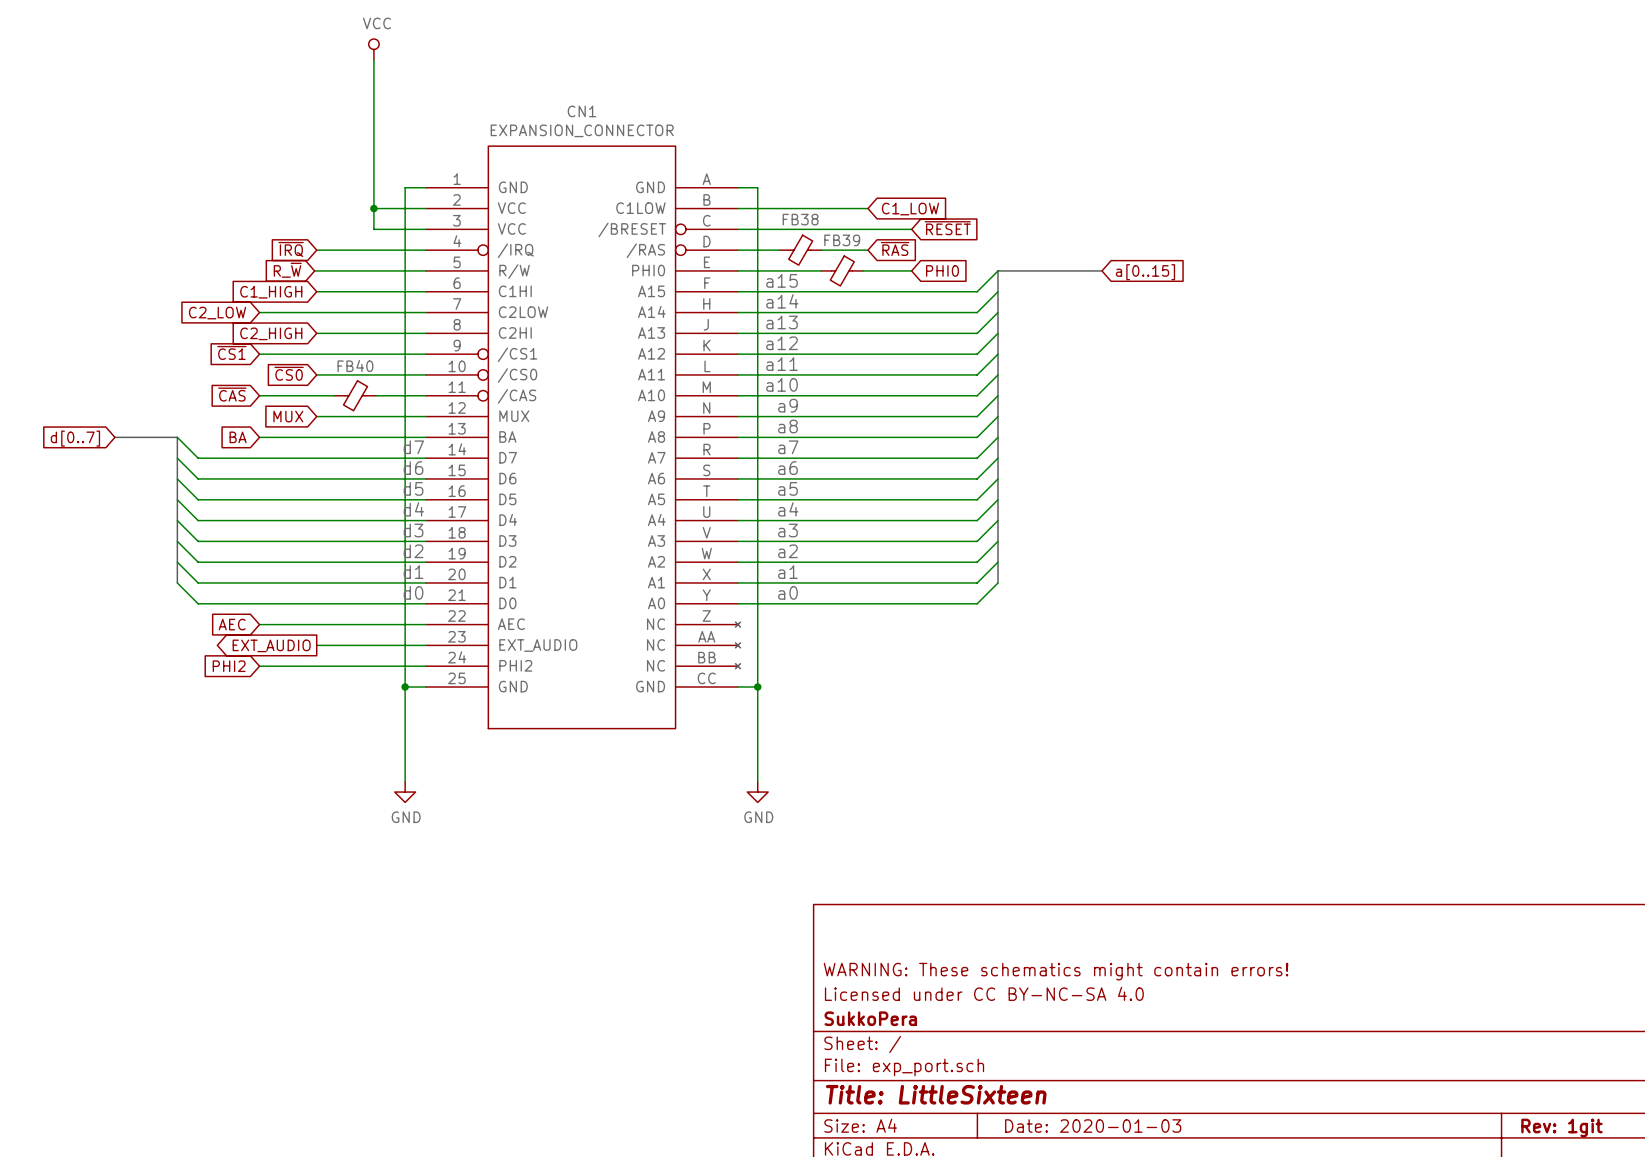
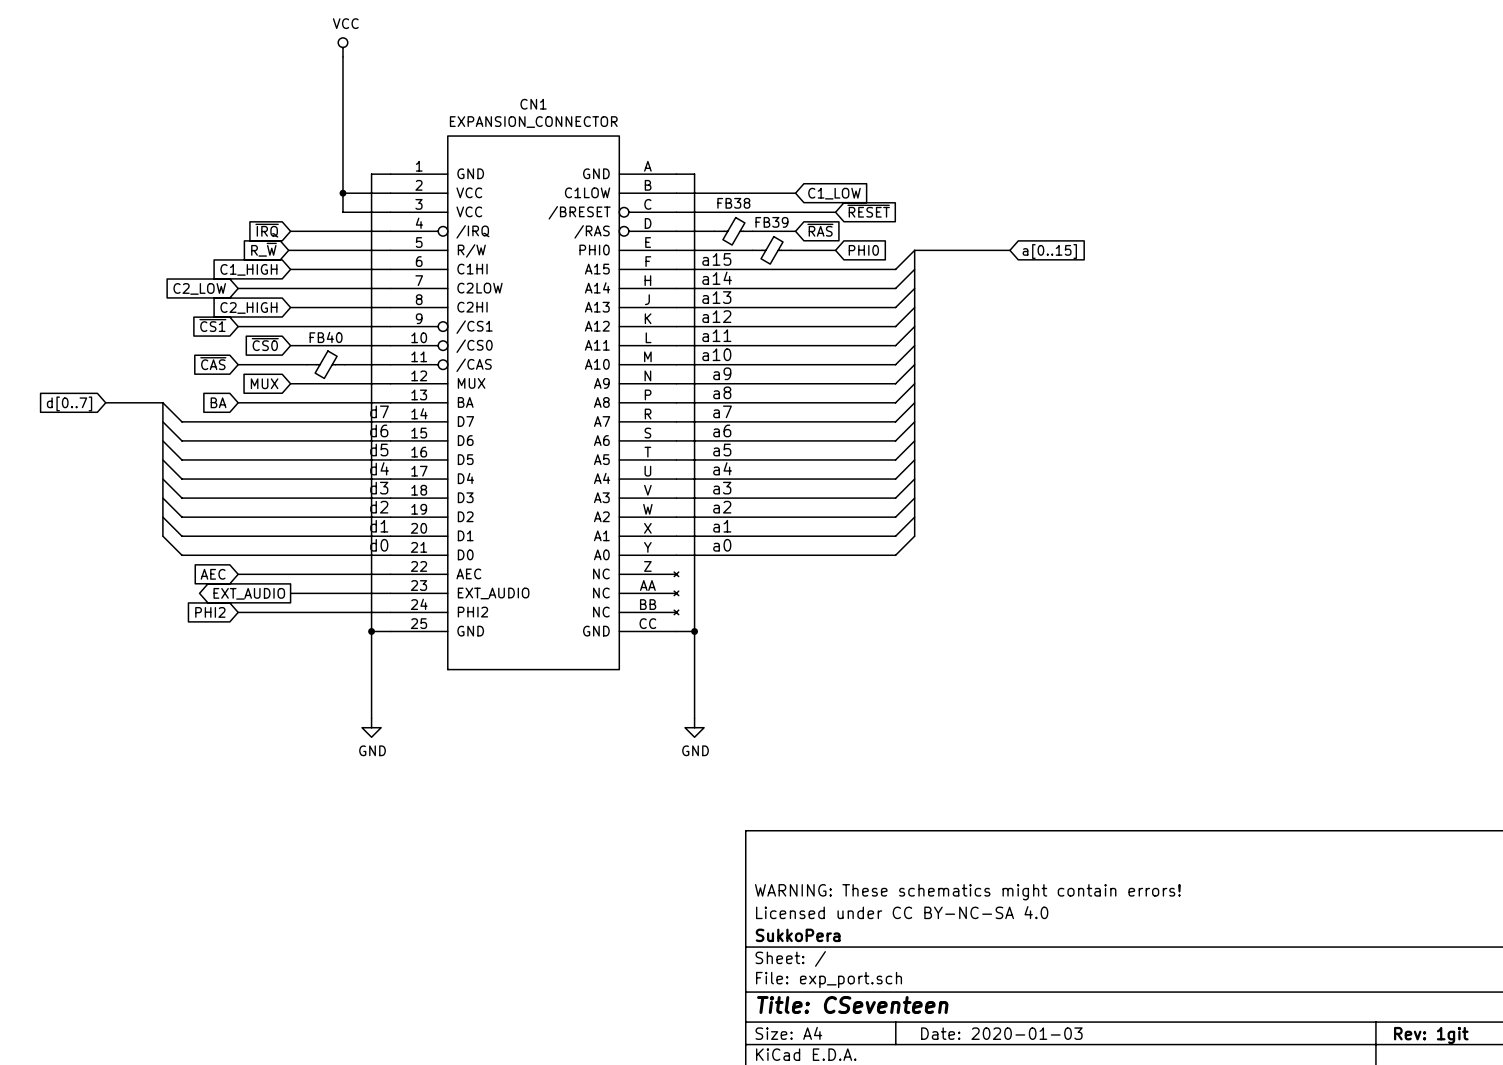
title block: Title: LittleSixteen (936, 1094) -> Title: CSeventeen (852, 1005)

